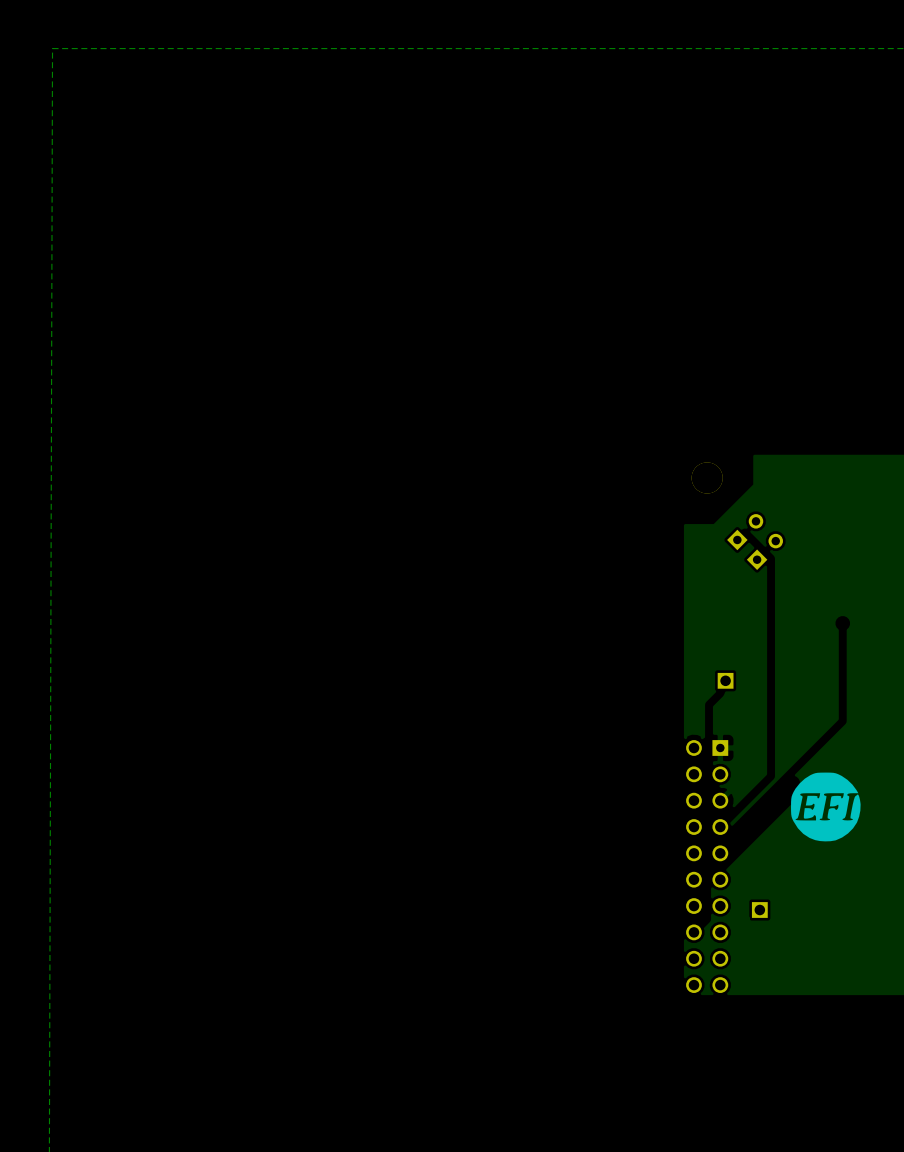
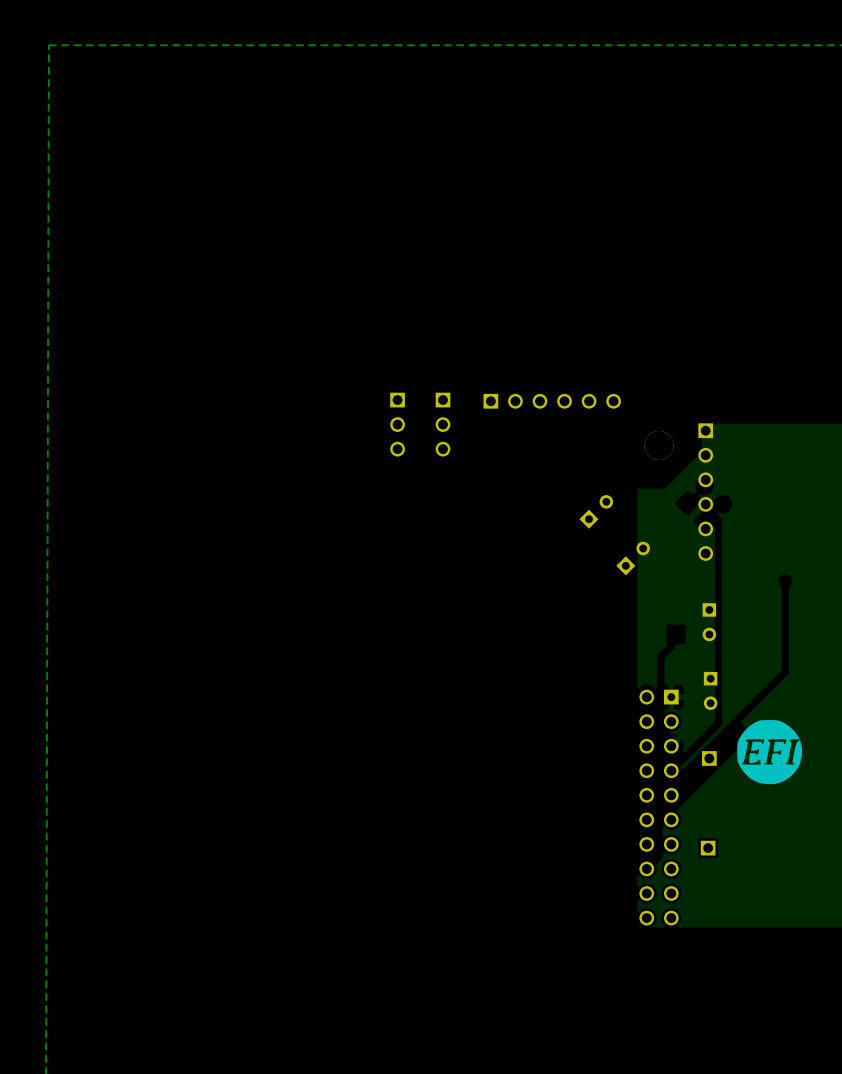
part: none -> (552, 401)
part: none -> (397, 424)
part: none -> (442, 424)
part: none -> (705, 492)
part: (745, 532) -> none
part: none -> (596, 511)
part: (764, 551) -> none
part: none -> (633, 558)
part: none -> (709, 622)
part position: (725, 680) -> (709, 758)
part: none -> (710, 690)

